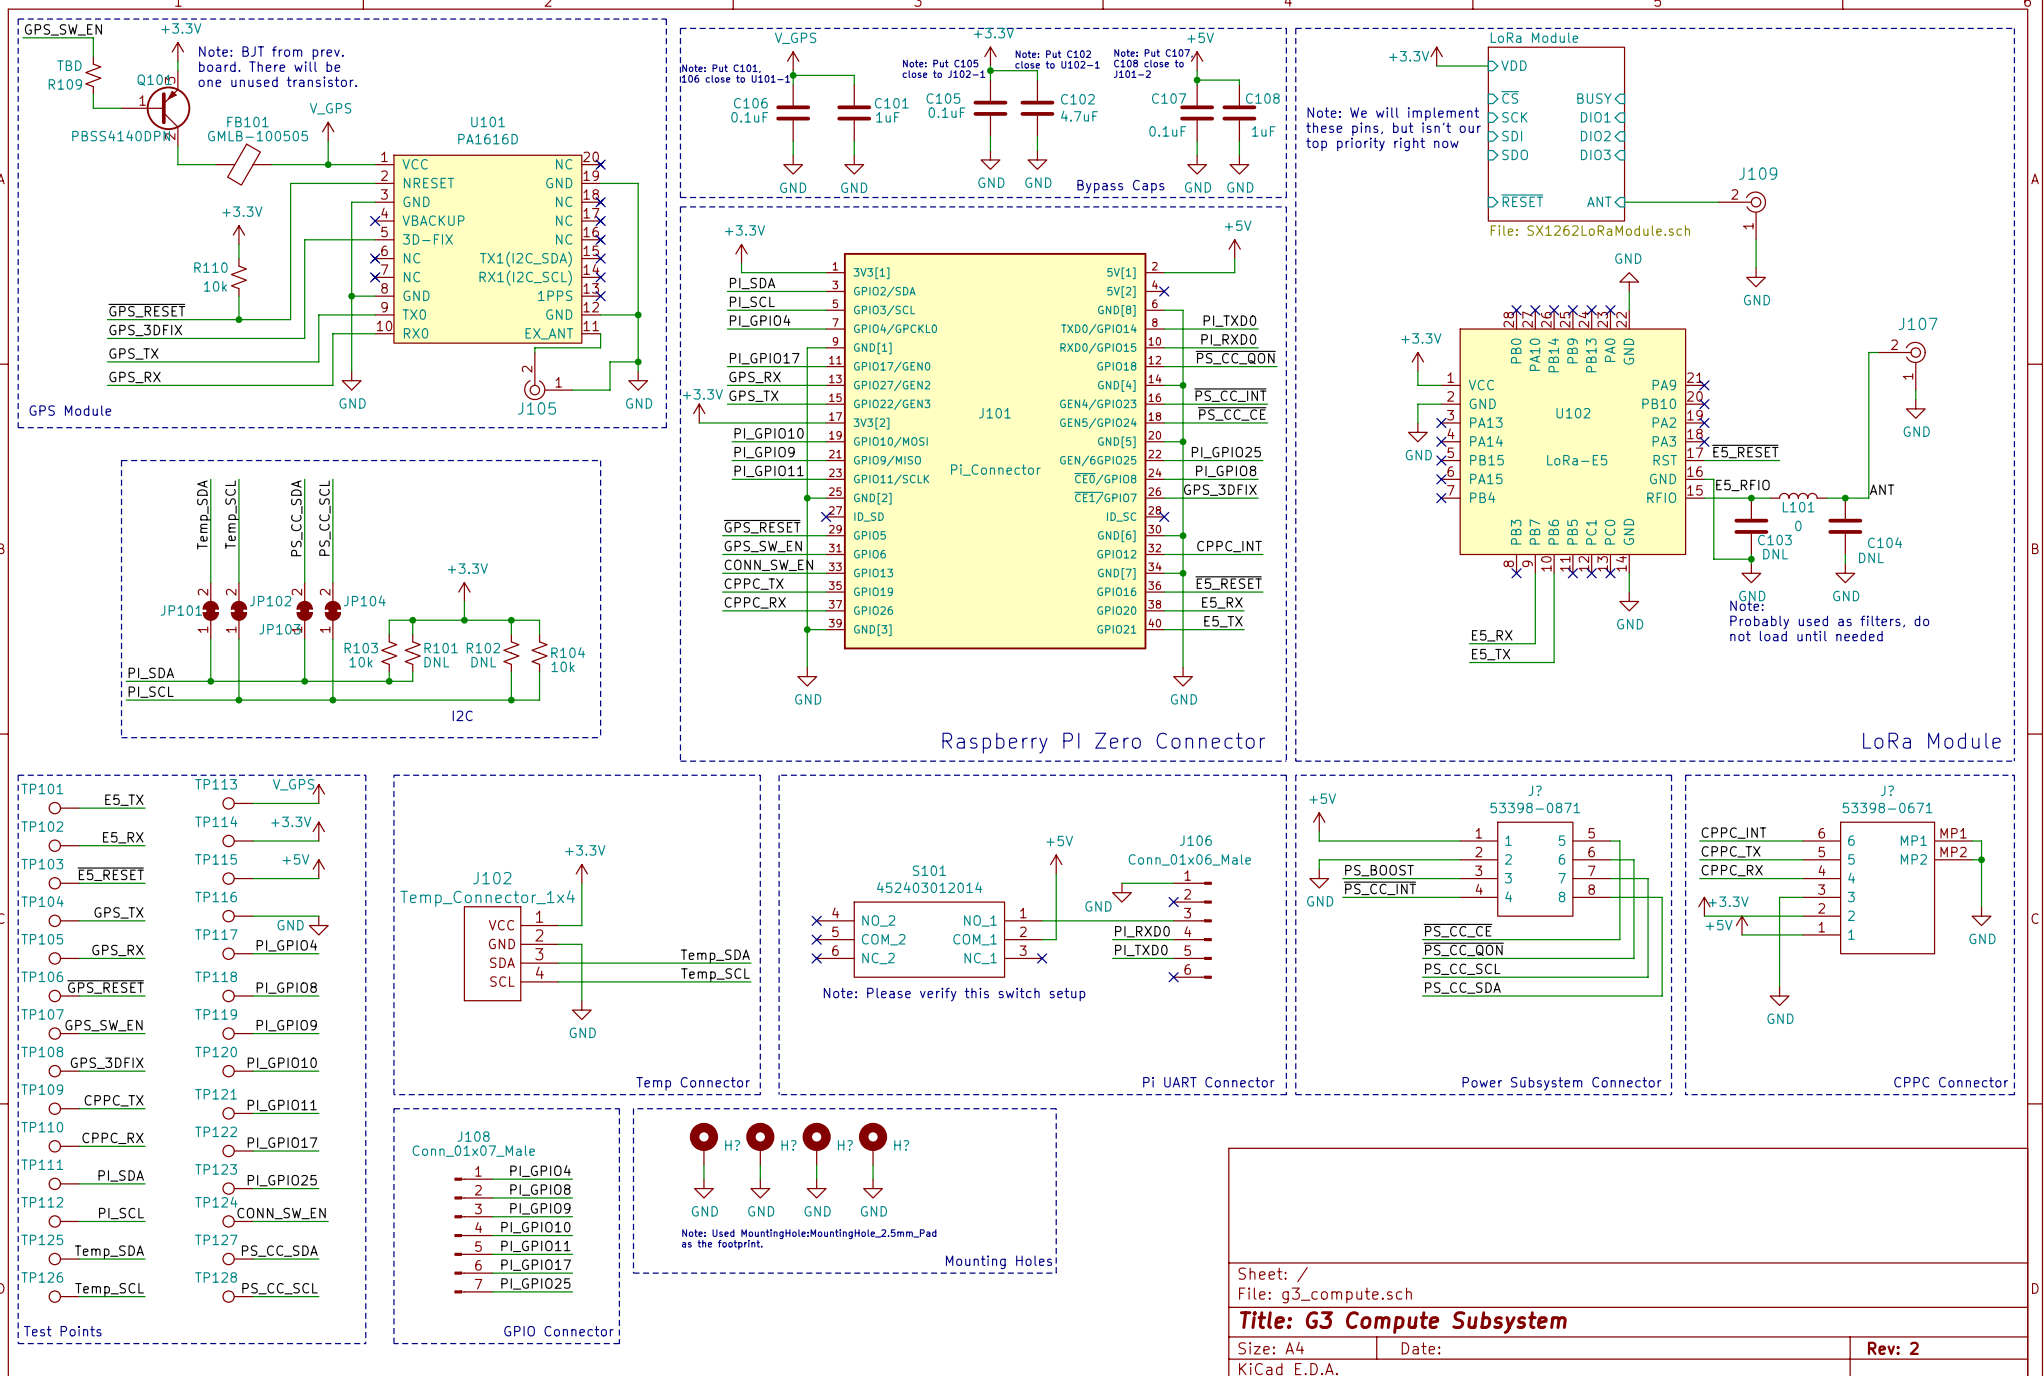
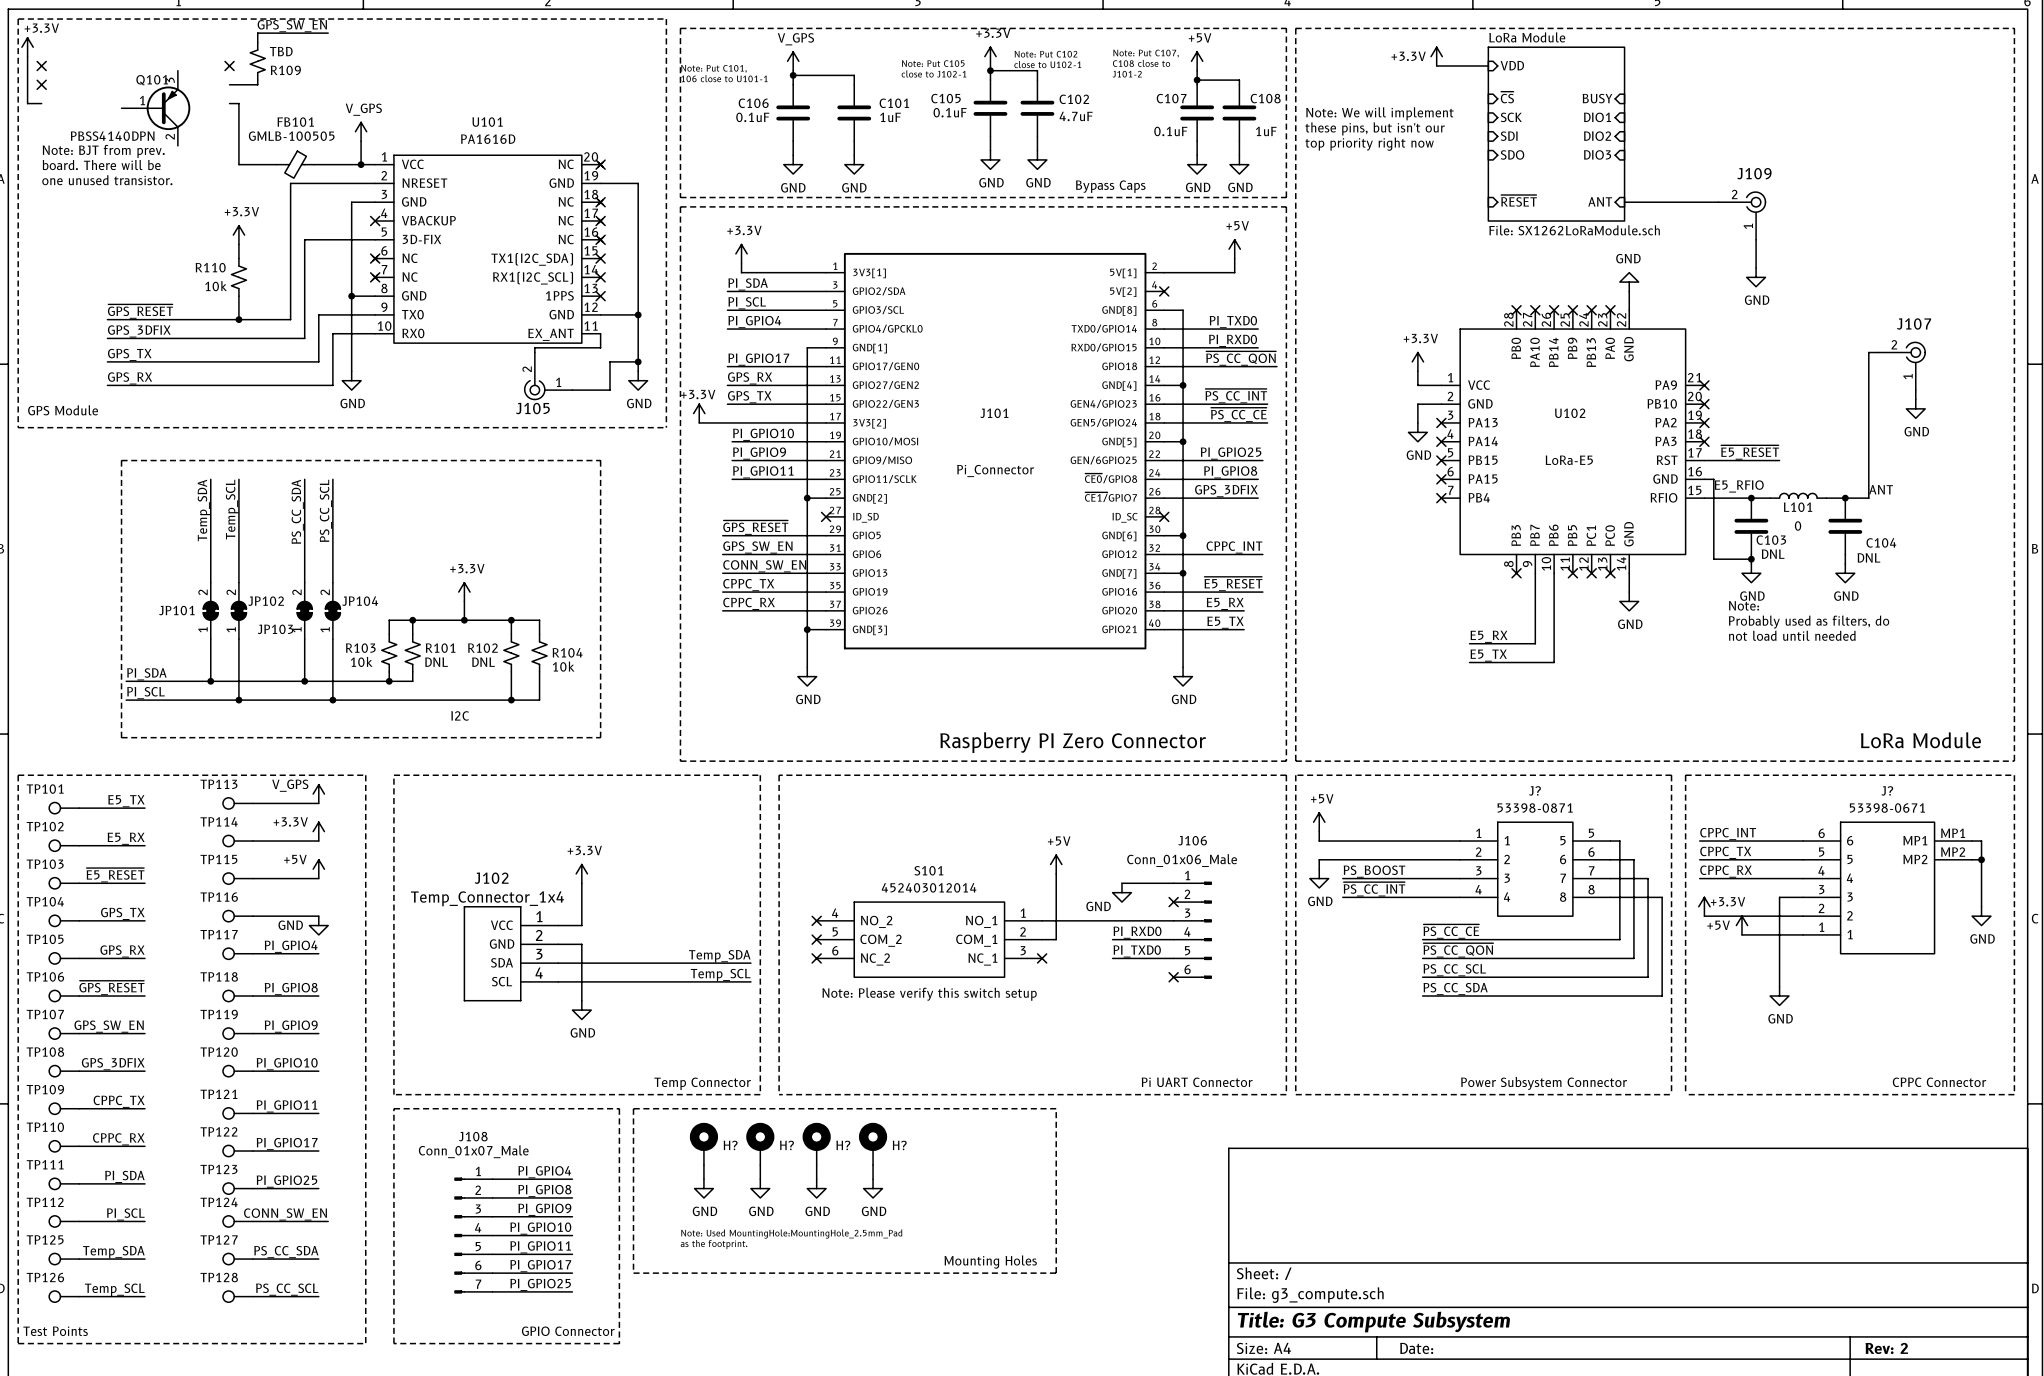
label: none -> GPS_SW_EN (292, 26)
power symbol text position: +3.3V (181, 28) -> +3.3V (41, 28)
label: GPS_SW_EN (63, 29) -> none
wire: none -> (328, 33) (257, 33) (257, 42)
wire: (22, 37) (93, 37) (93, 56) -> none
power symbol position: +3.3V (177, 51) -> +3.3V (27, 47)
text position: Note: BJT from prev. (271, 53) -> Note: BJT from prev. (103, 151)
wire: none -> (27, 56) (27, 103) (41, 103)
wire: (177, 61) (177, 70) -> none
no-connect mark: none -> (41, 66)
no-connect mark: none -> (229, 66)
text position: board. There will be (269, 66) -> board. There will be (101, 165)
R109 flip: as is (93, 75) -> left-right (257, 61)
R109 position: (93, 75) -> (257, 61)
wire: none -> (257, 80) (257, 84) (229, 84)
text position: one unused transistor. (277, 81) -> one unused transistor. (107, 180)
no-connect mark: none -> (41, 84)
wire: (93, 94) (93, 108) (121, 108) -> none
wire: none -> (229, 103) (238, 103) (238, 164) (271, 164)
power symbol position: V_GPS (328, 131) -> V_GPS (361, 131)
wire: (328, 141) (328, 164) -> (361, 141) (361, 164)
FB101 symbol: [215, 144, 272, 186] -> [276, 151, 315, 179]
wire: (177, 145) (177, 164) (215, 164) -> none
junction position: (328, 164) -> (361, 164)

